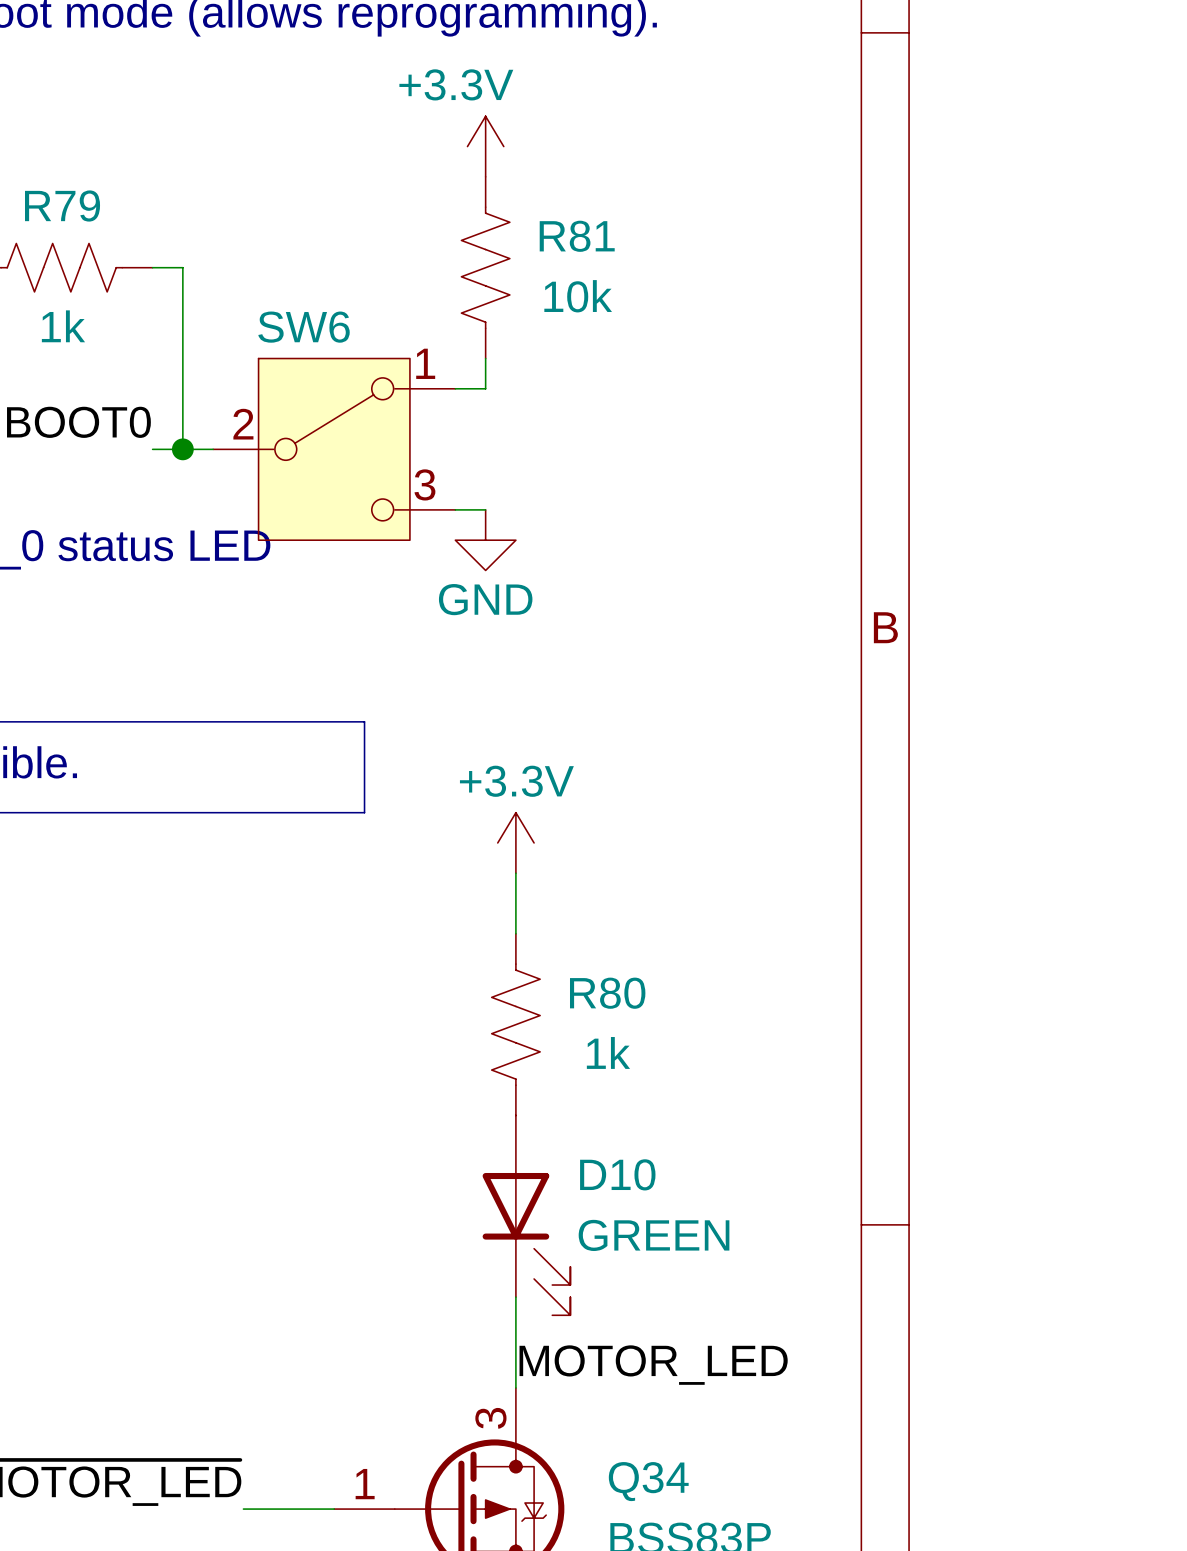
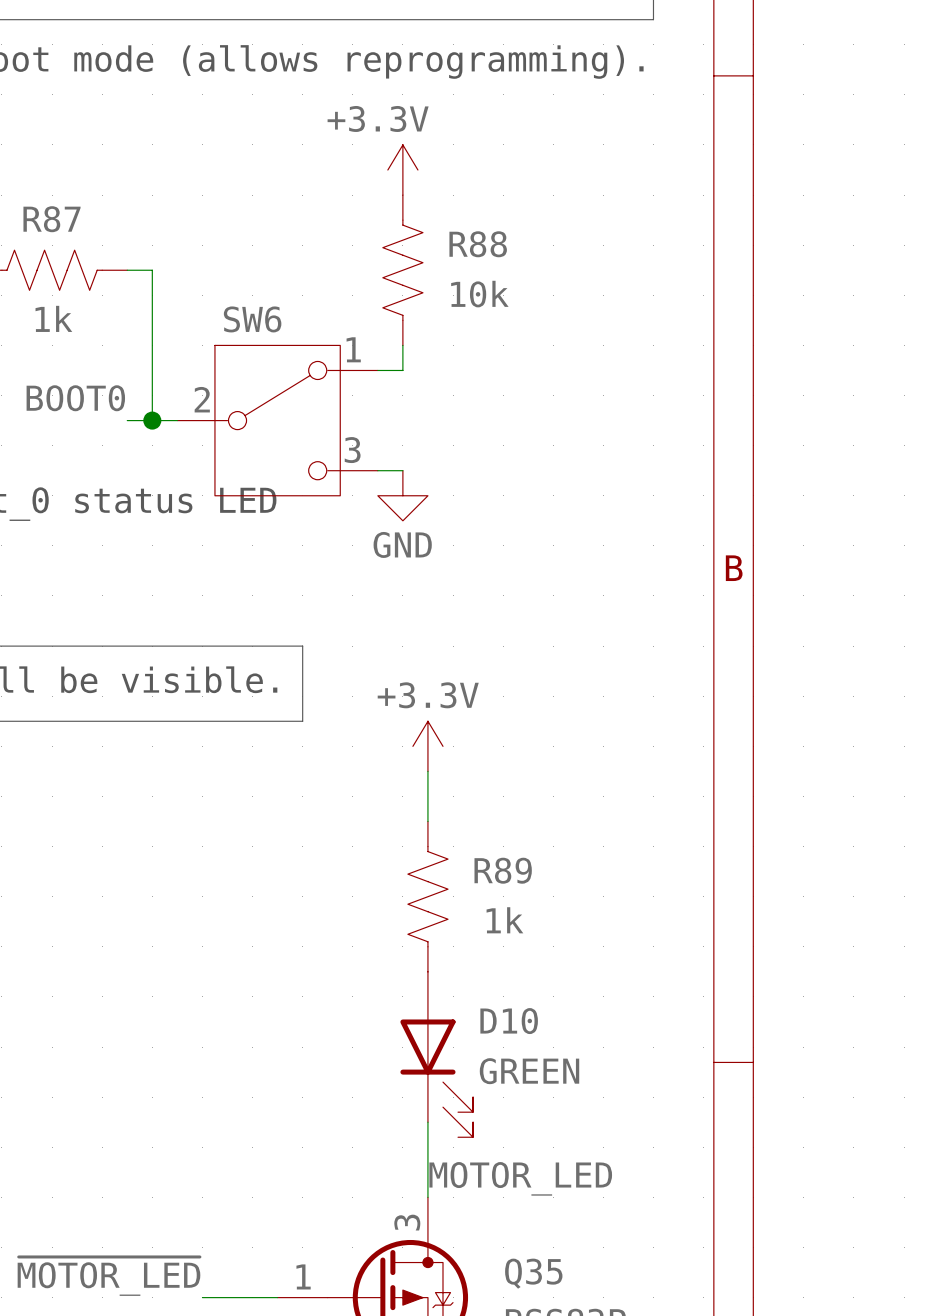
R79 name: R79 (62, 206) -> R87 (52, 219)
R81 name: R81 (577, 236) -> R88 (478, 244)
R80 name: R80 (607, 993) -> R89 (503, 870)
Q34 name: Q34 (648, 1481) -> Q35 (533, 1273)

